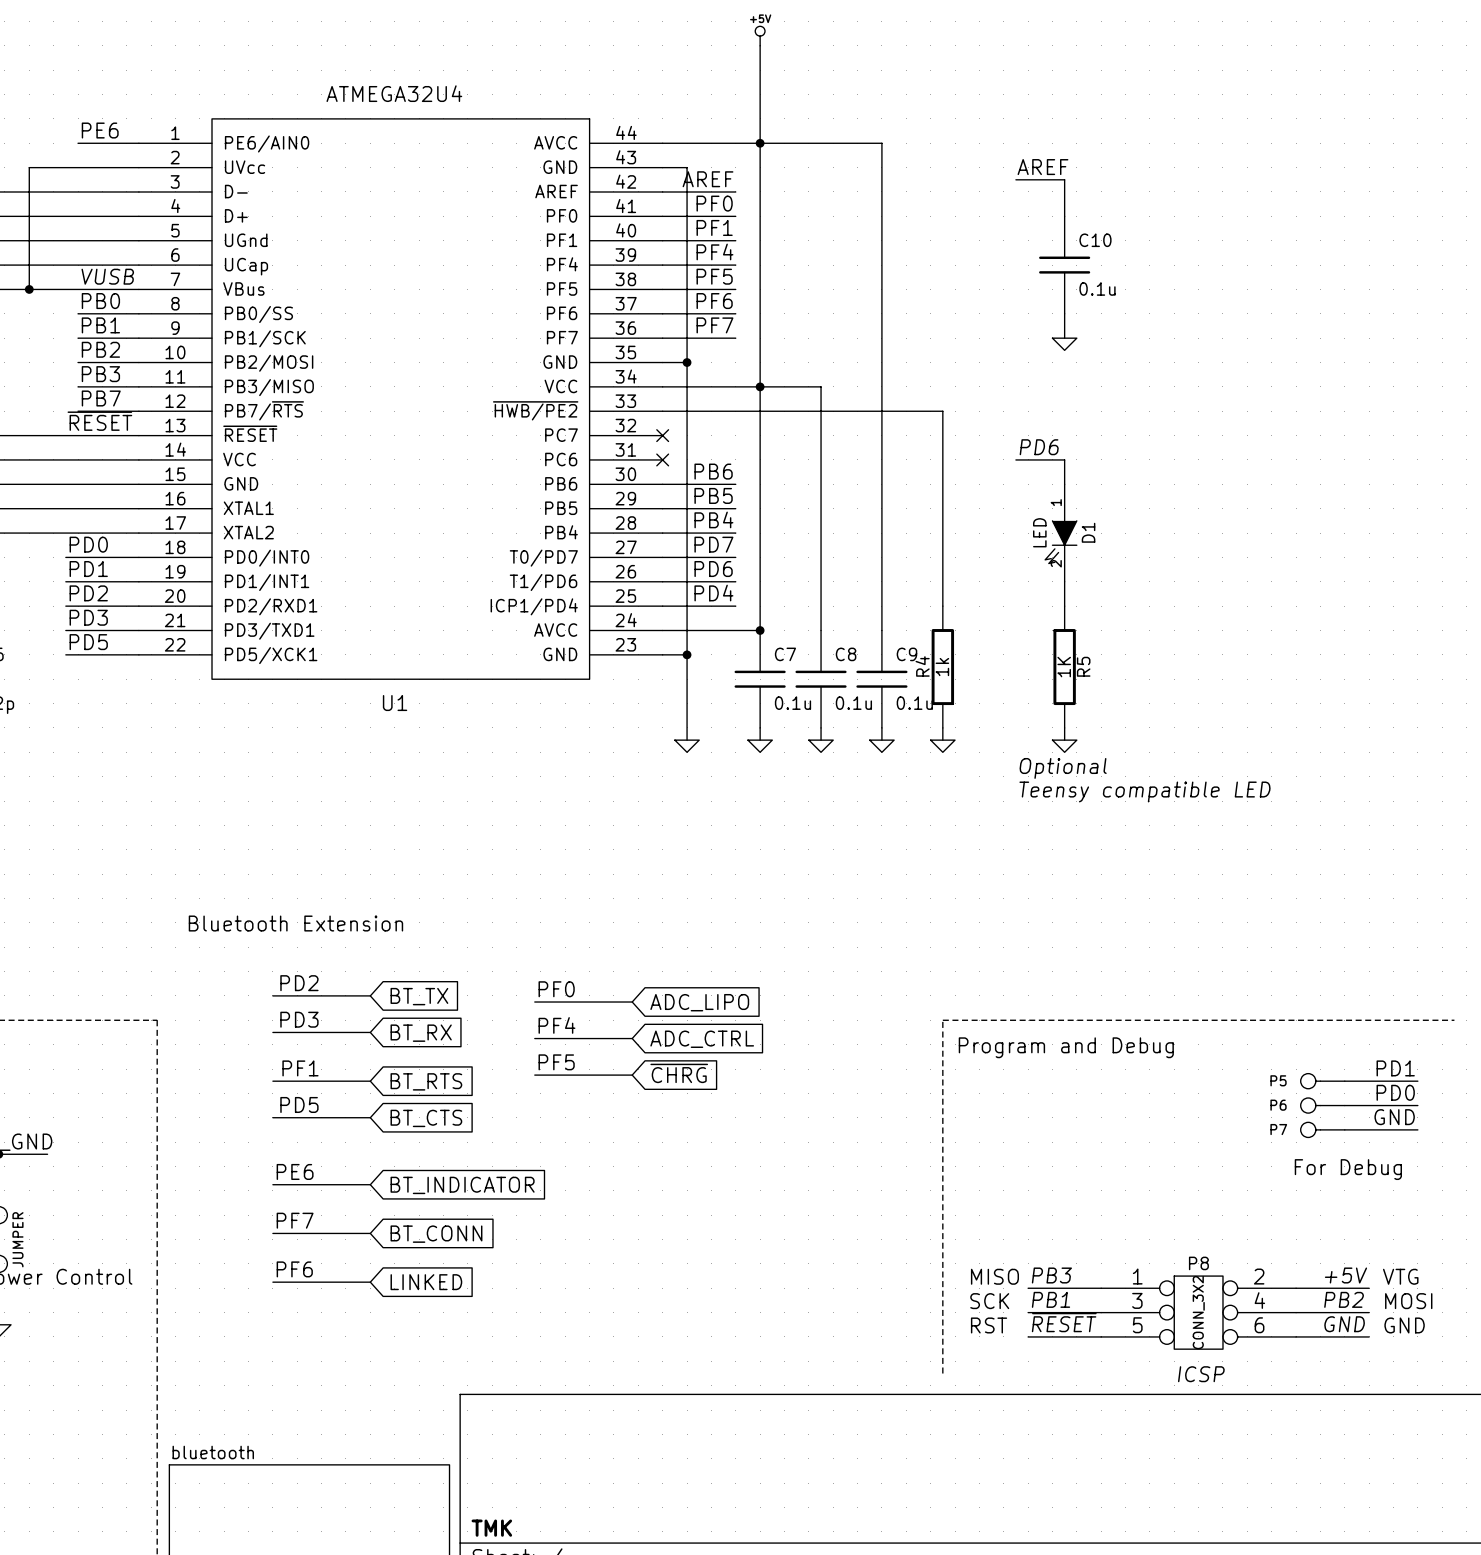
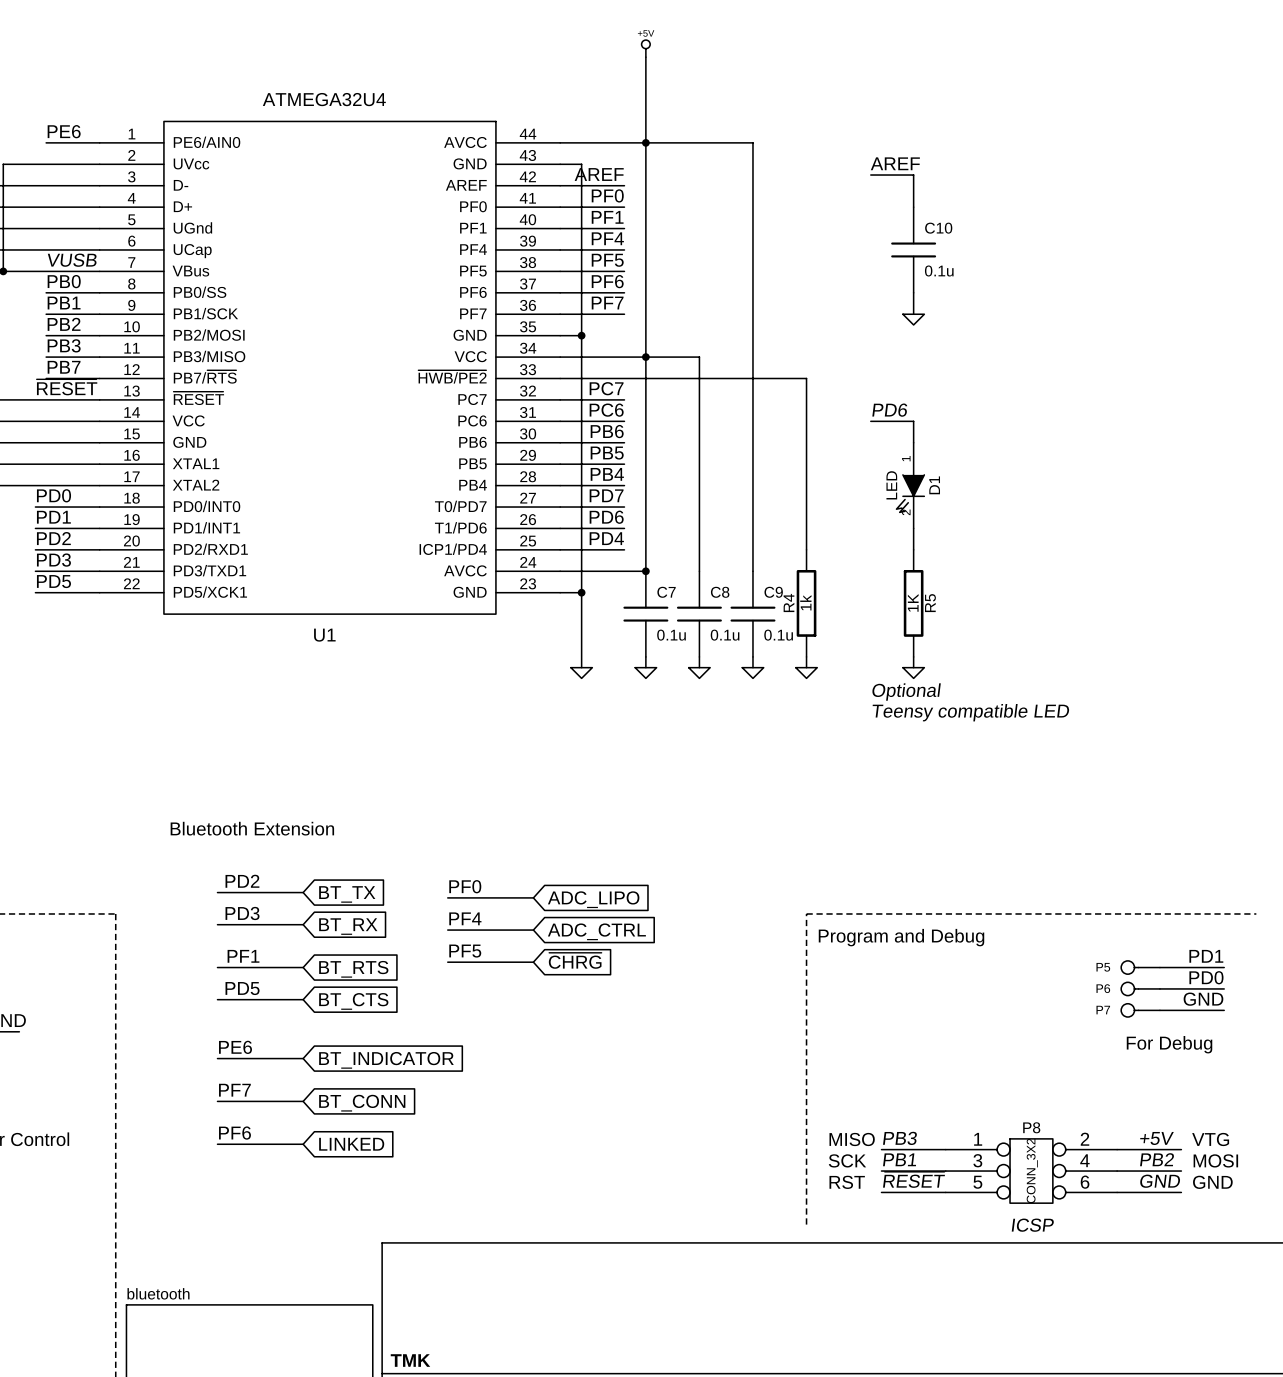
label: none -> PC7 (606, 388)
wire: none -> (560, 399) (624, 399)
no-connect mark: (662, 435) -> none
label: none -> PC6 (606, 410)
wire: none -> (560, 421) (624, 421)
no-connect mark: (662, 459) -> none

